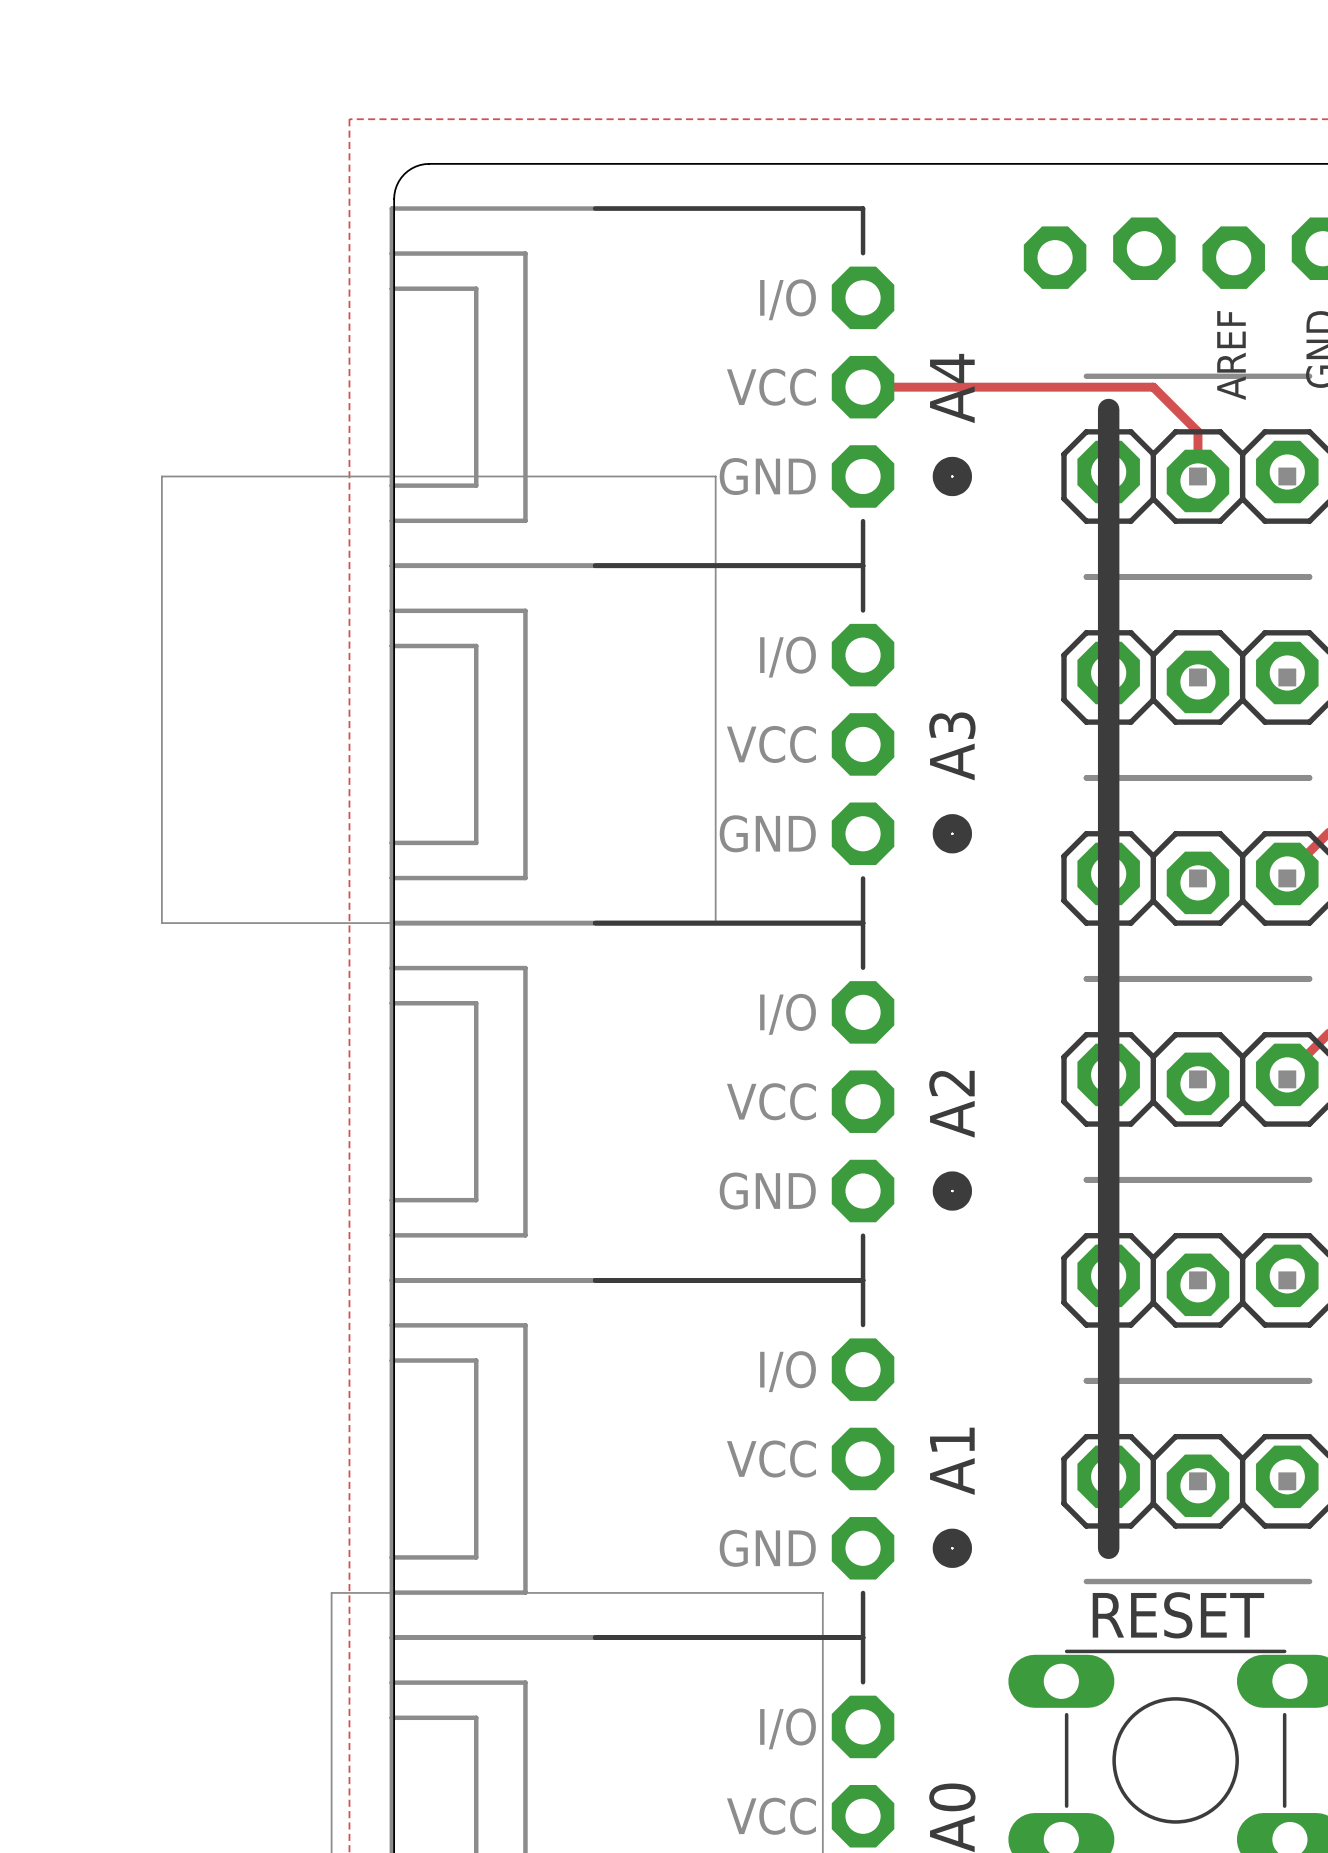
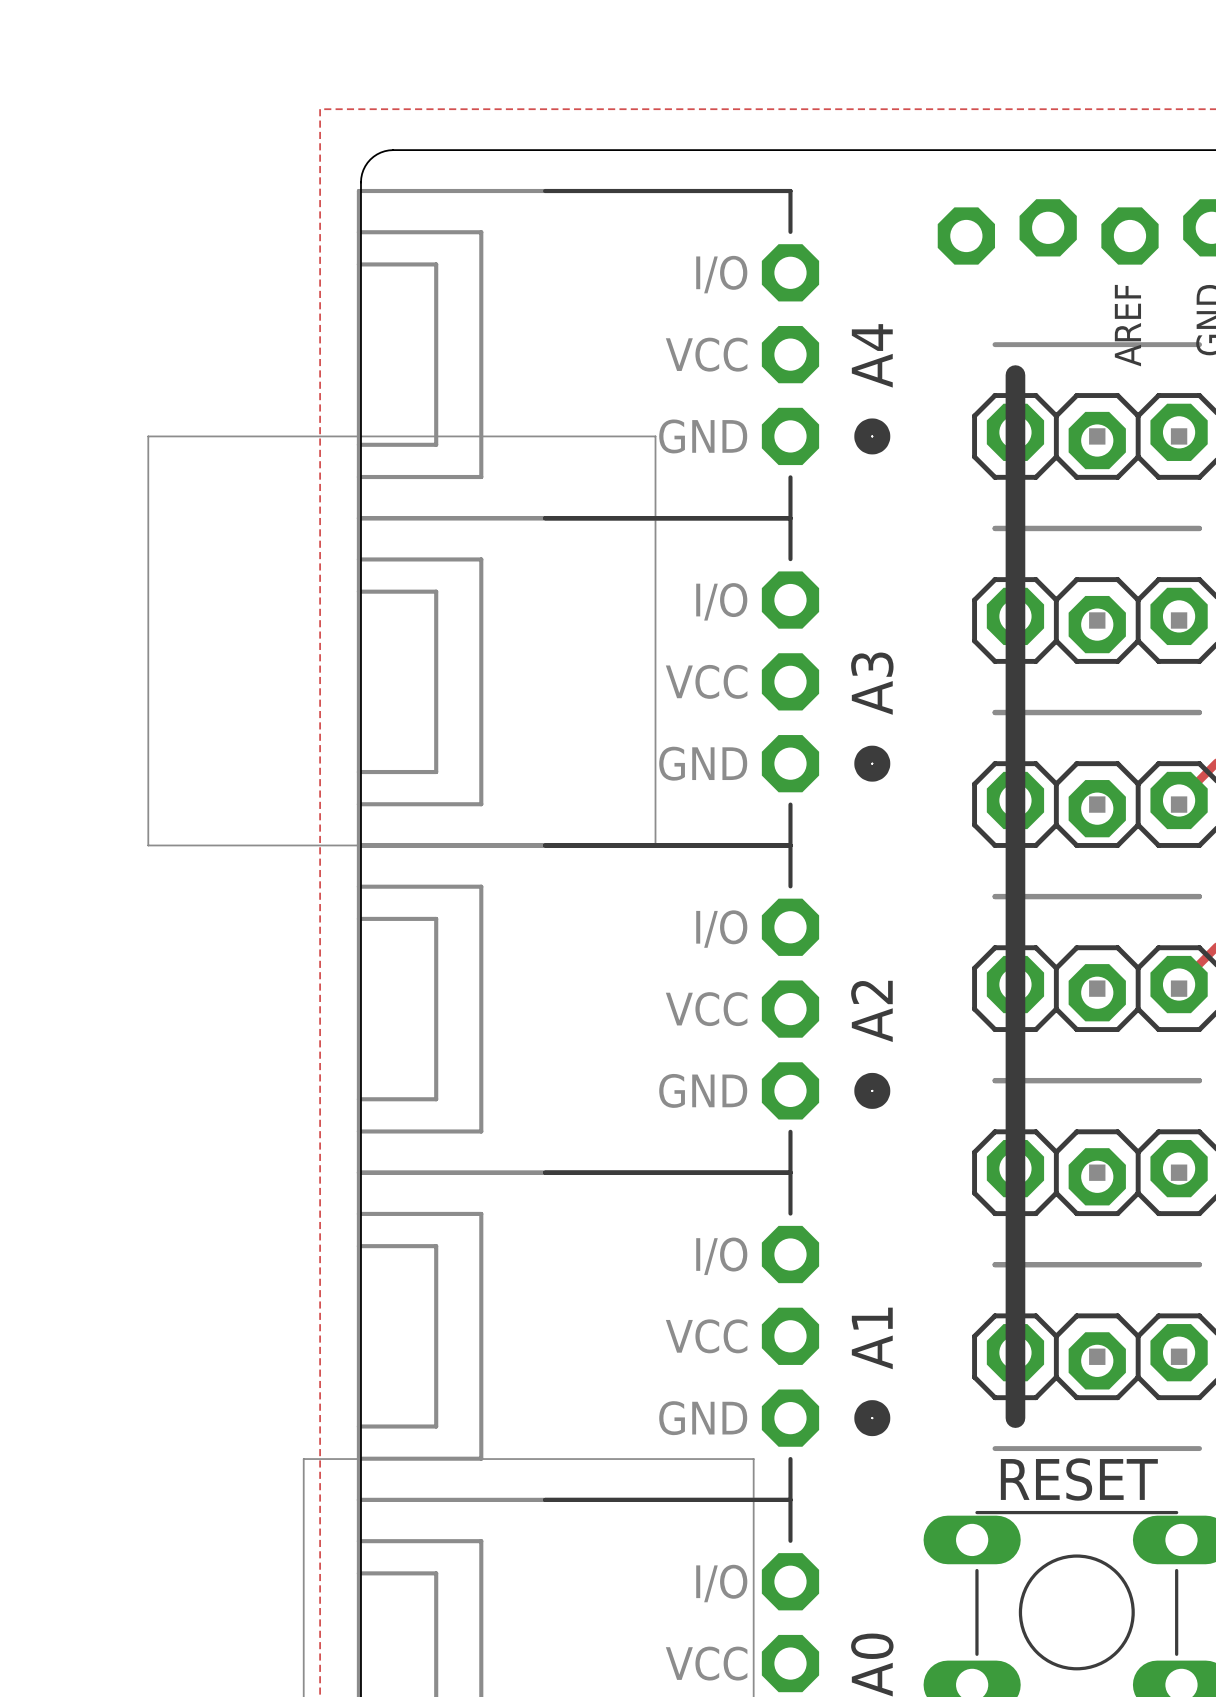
track: (863, 387) (1153, 387) (1197, 431) (1197, 480) -> none

